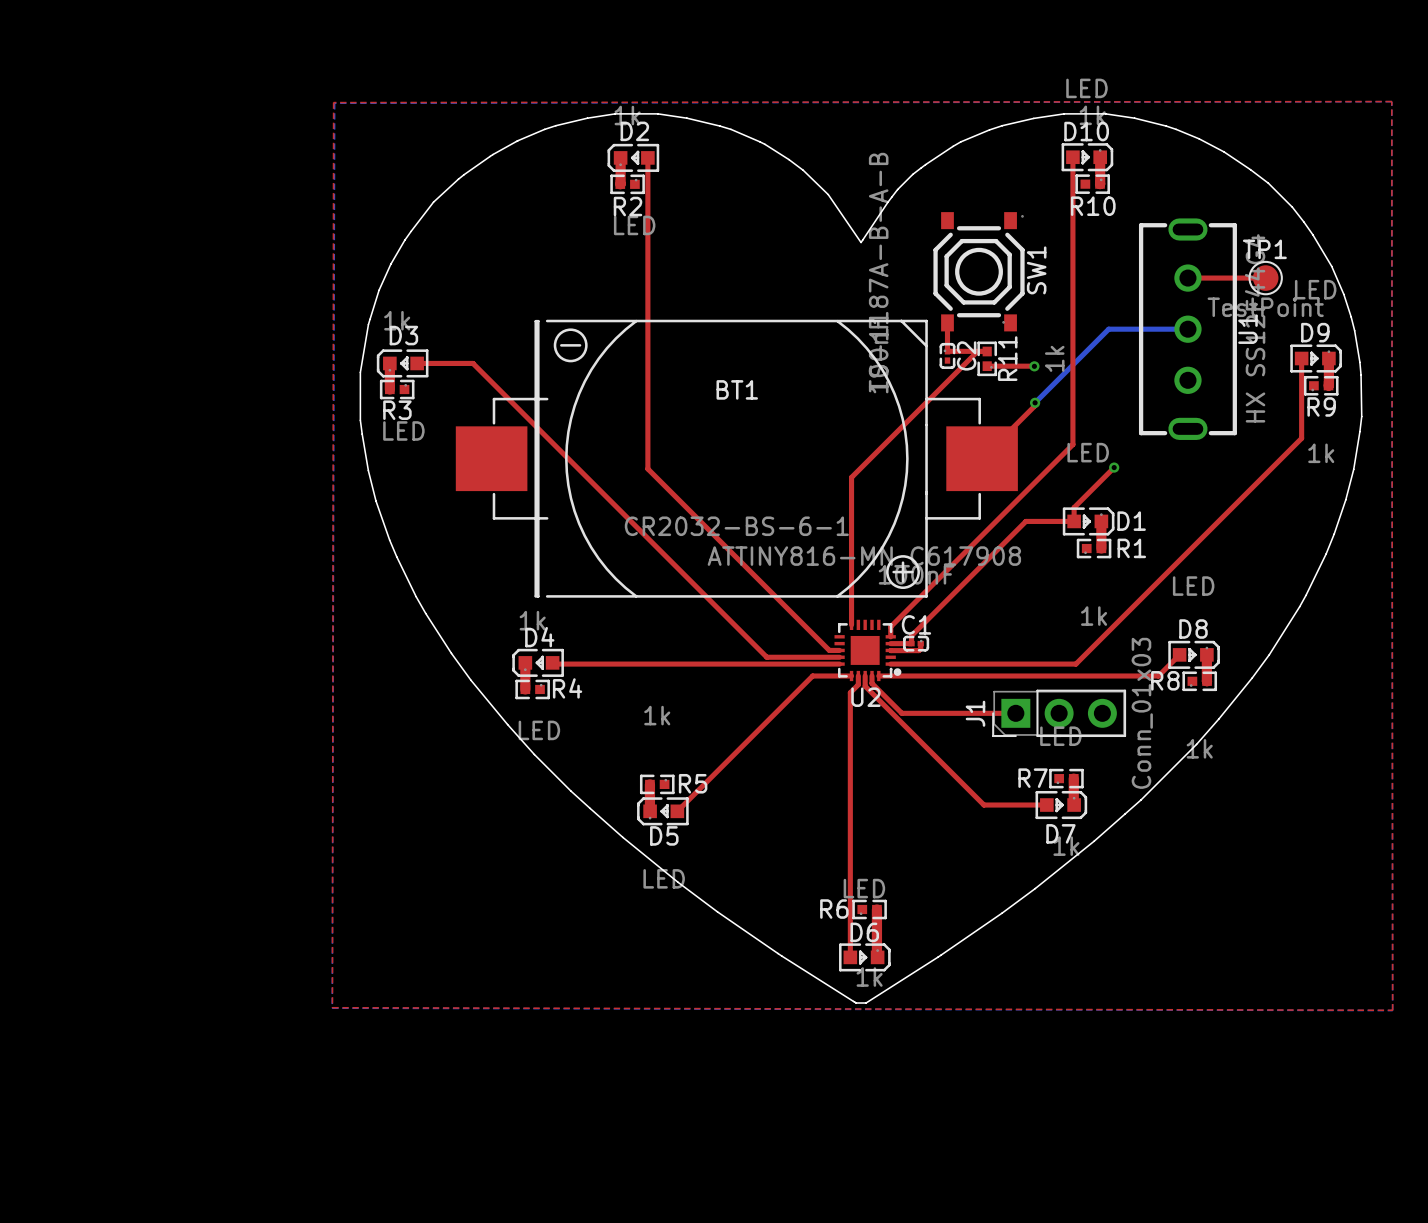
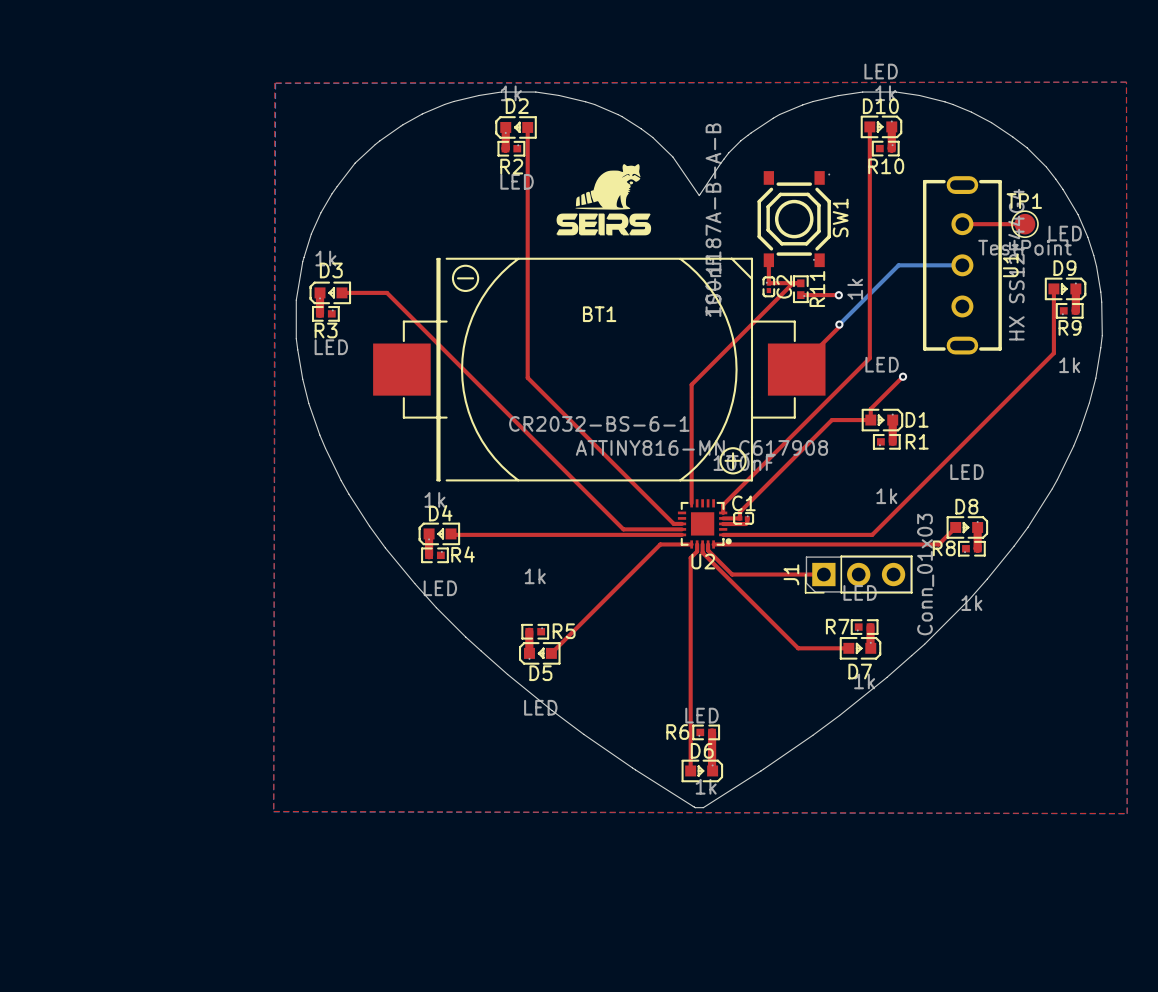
drawing: none -> [556, 164, 652, 236]

